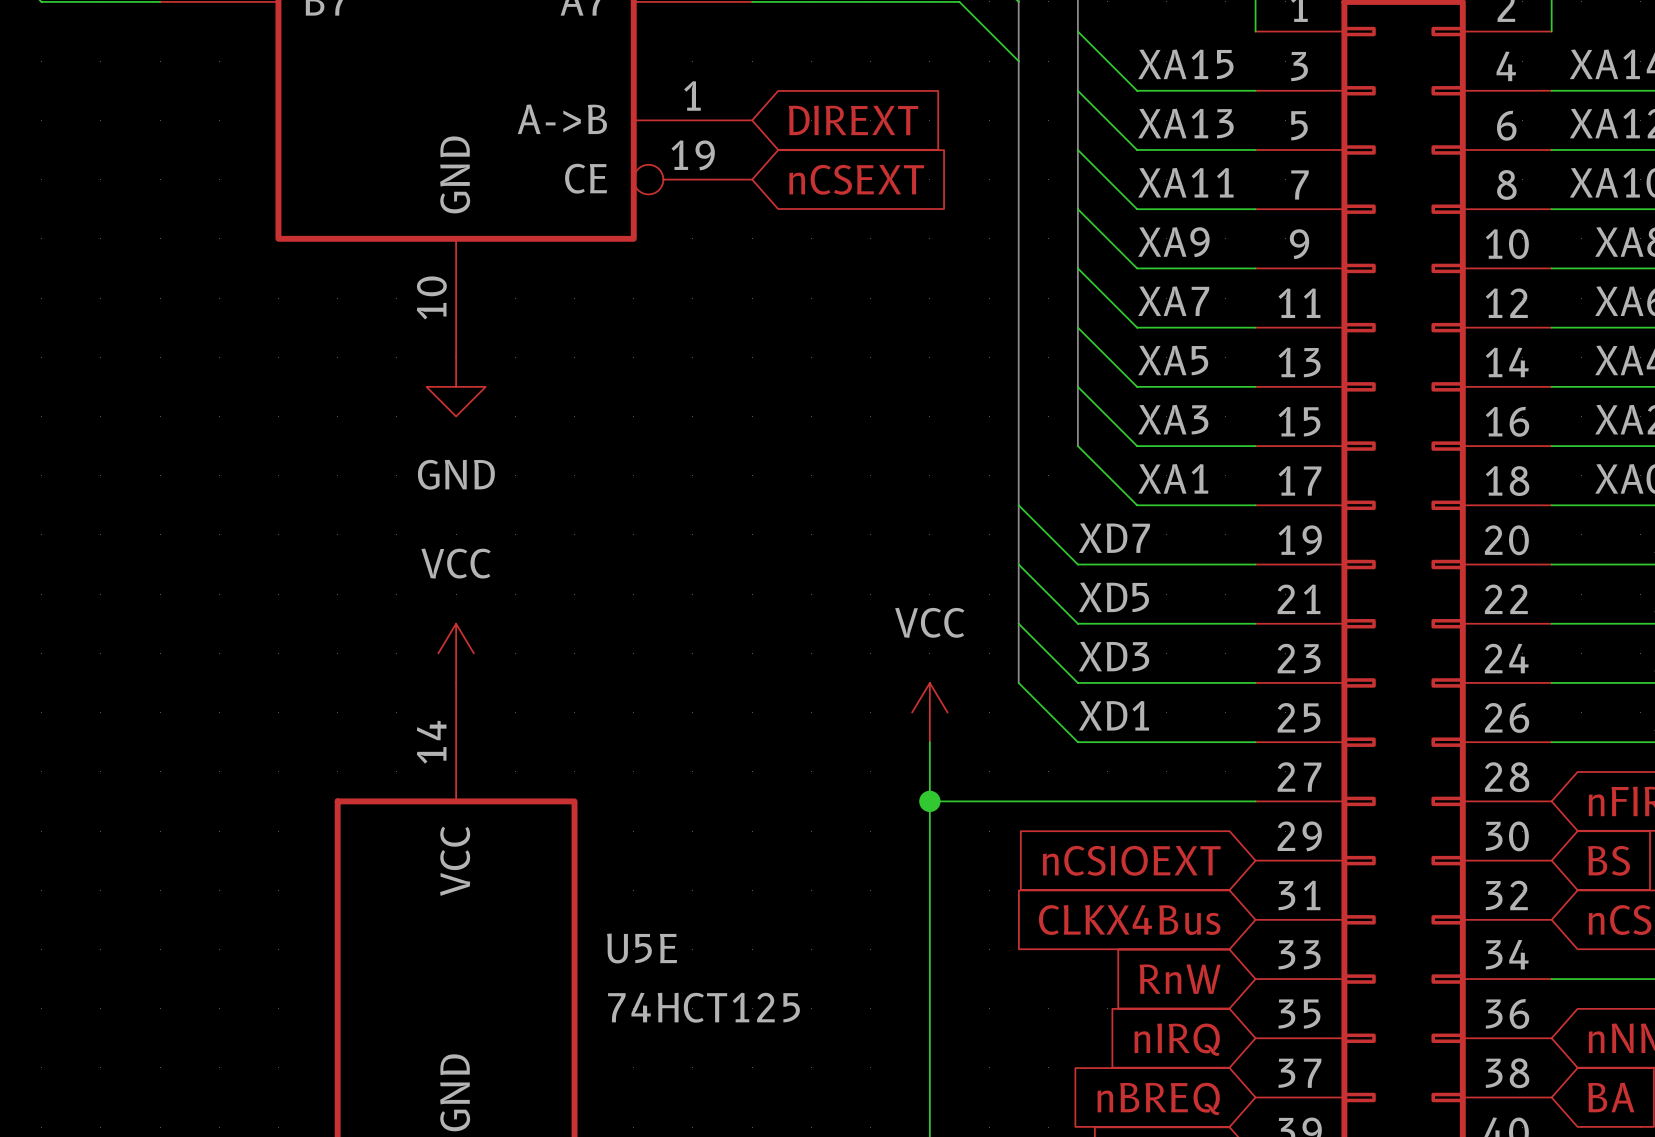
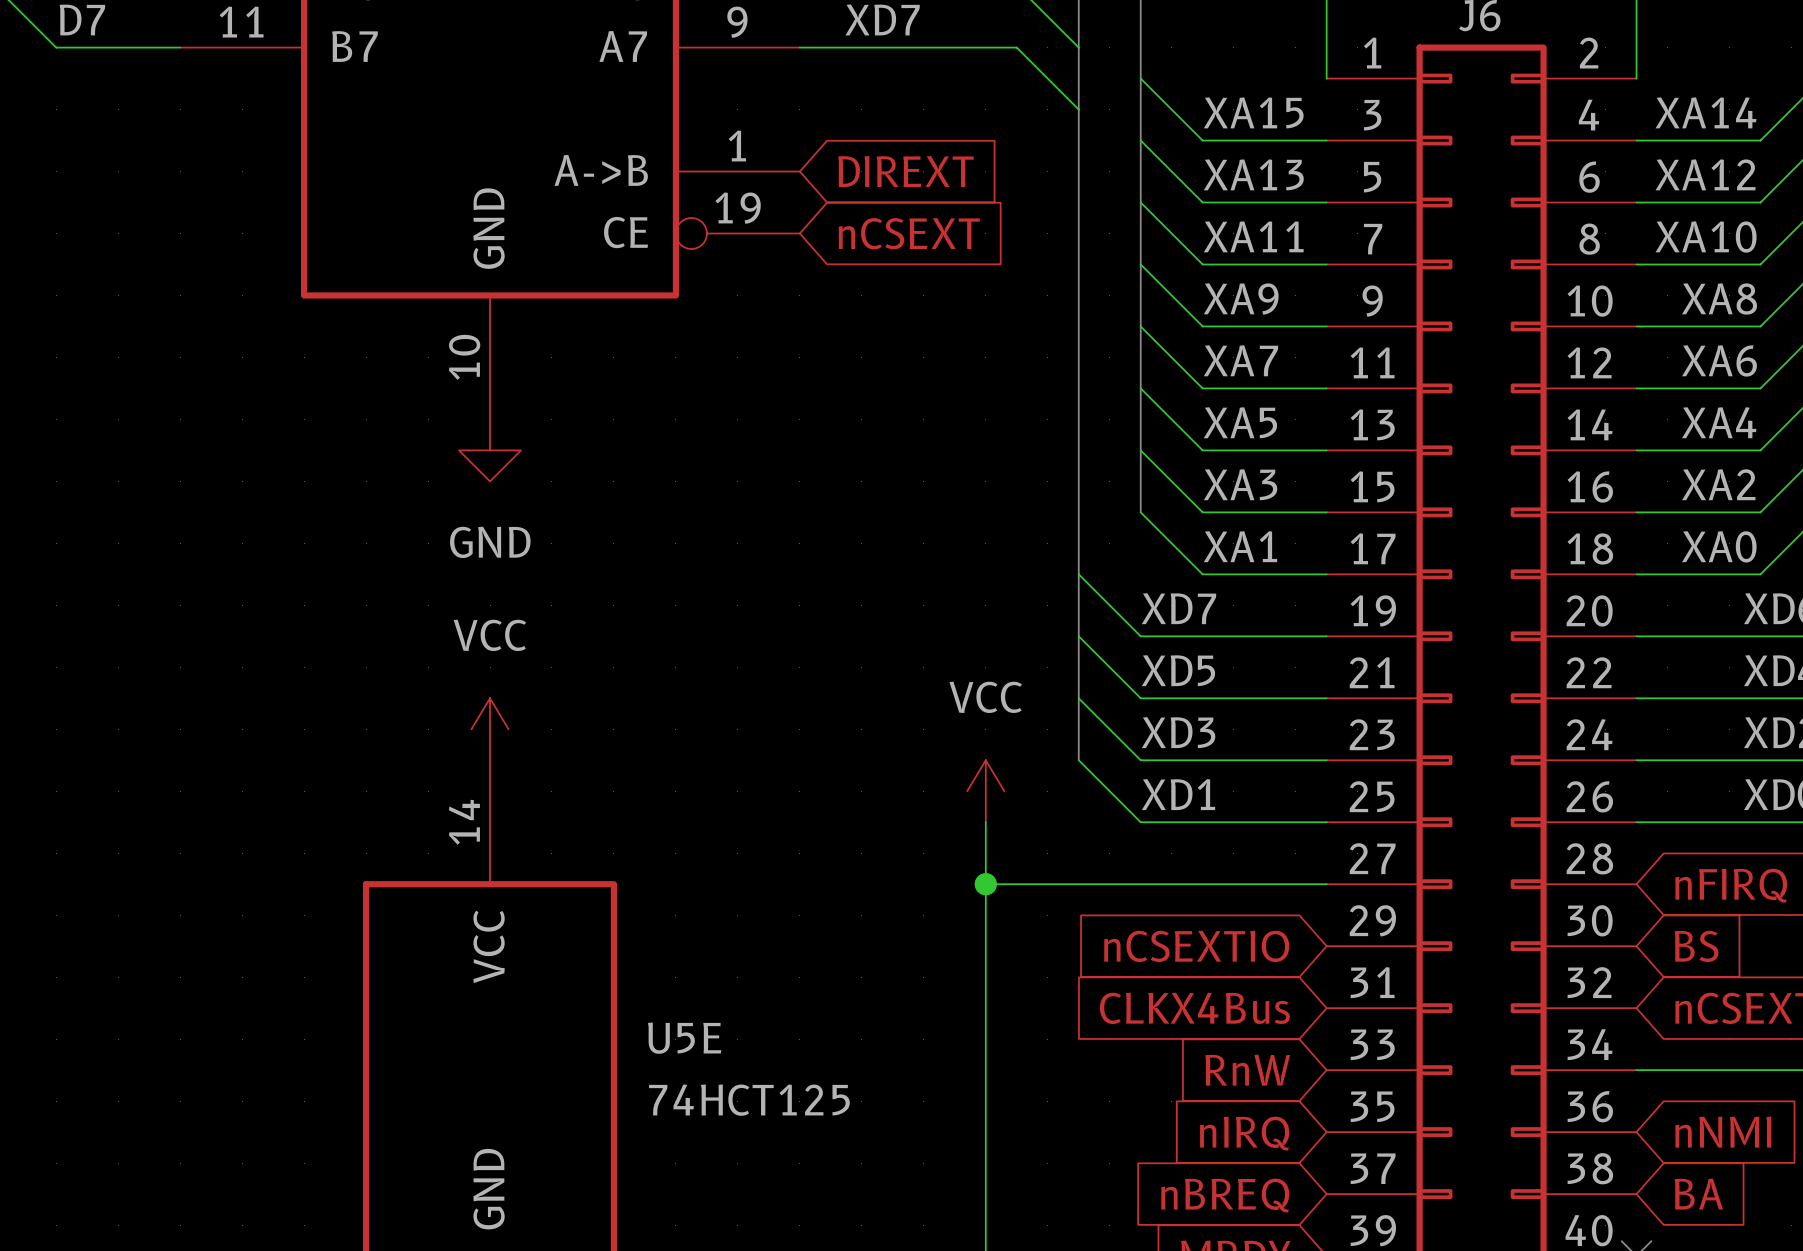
global label: nCSIOEXT (1131, 860) -> nCSEXTIO (1196, 946)

